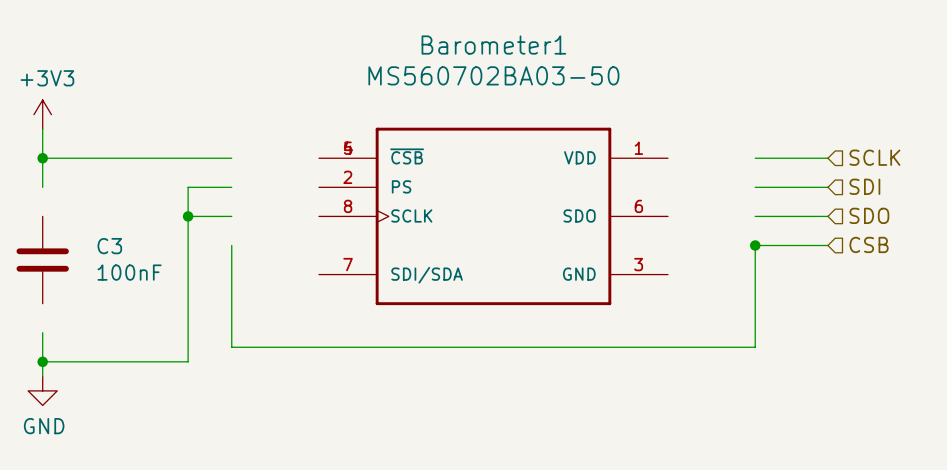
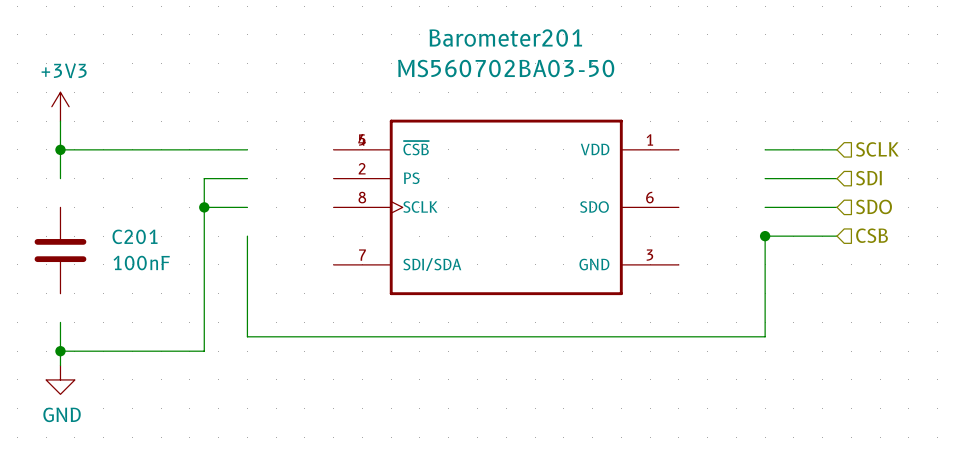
Barometer1 name: Barometer1 (493, 45) -> Barometer201 (505, 38)
C3 name: C3 (109, 246) -> C201 (135, 236)

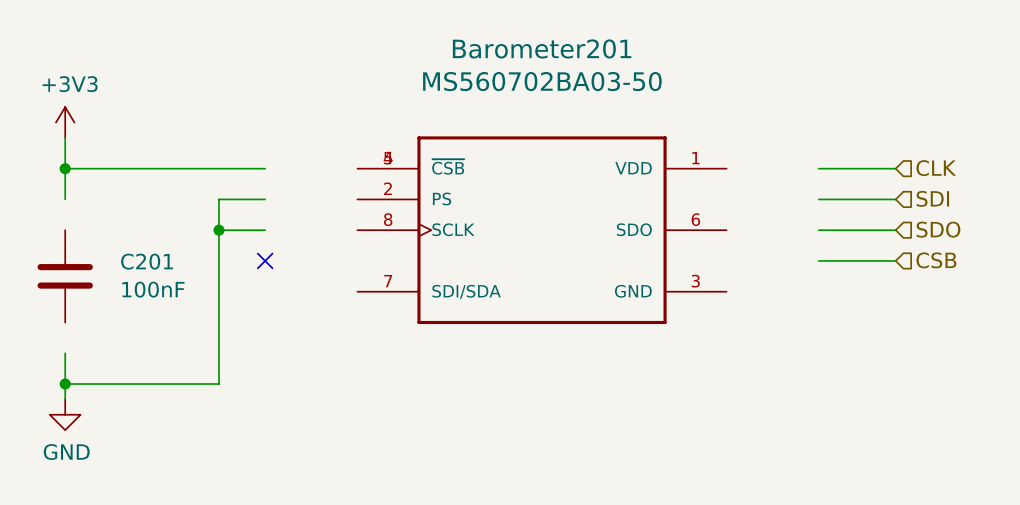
hierarchical label: SCLK (877, 149) -> CLK (936, 168)
wire: (247, 236) (247, 336) (765, 336) (765, 236) -> none
no-connect mark: none -> (265, 260)
junction: (765, 236) -> none

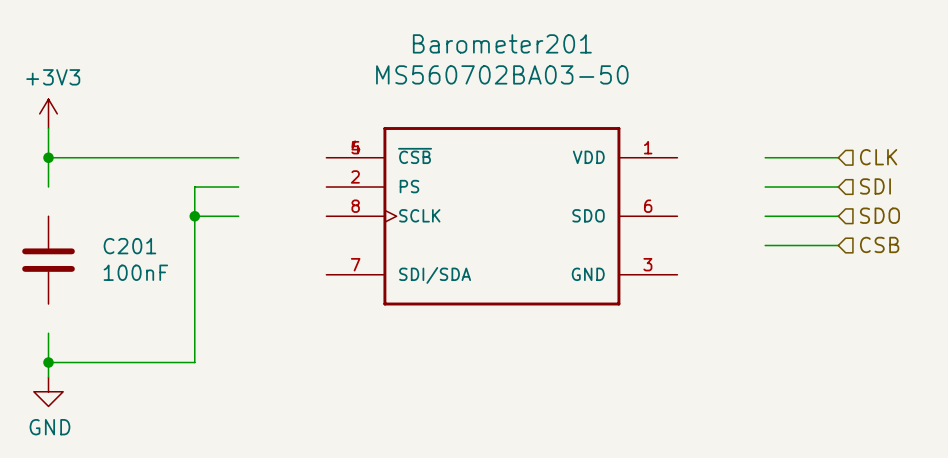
no-connect mark: (265, 260) -> none

